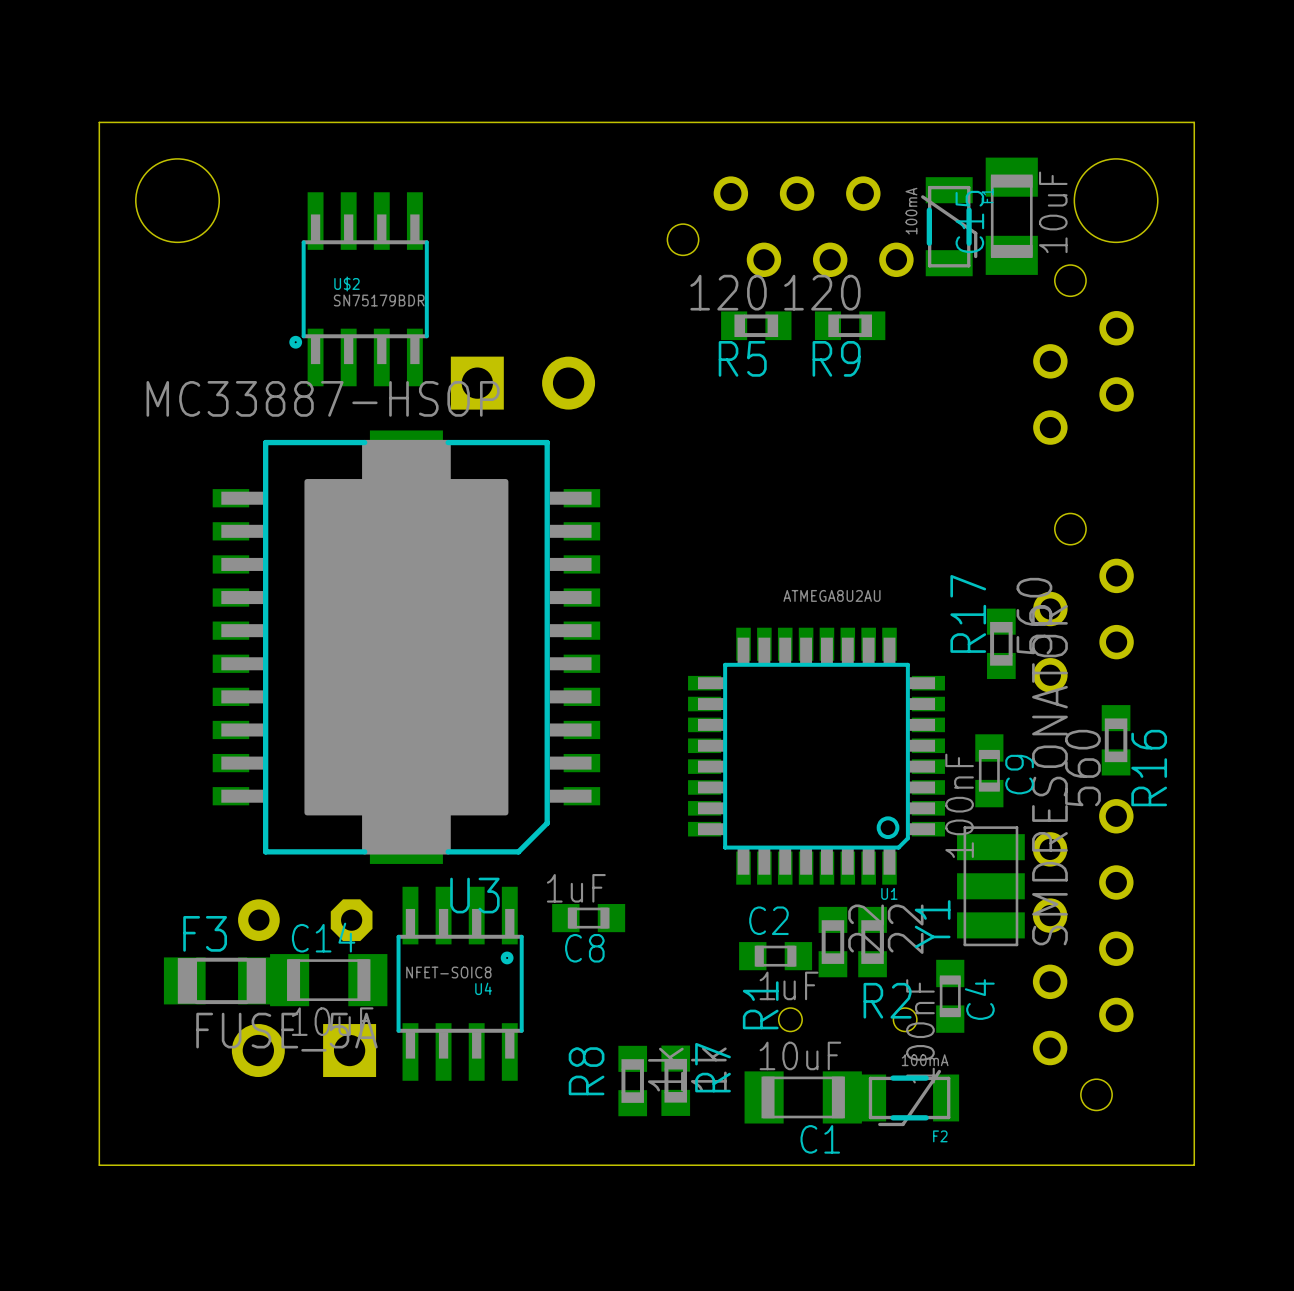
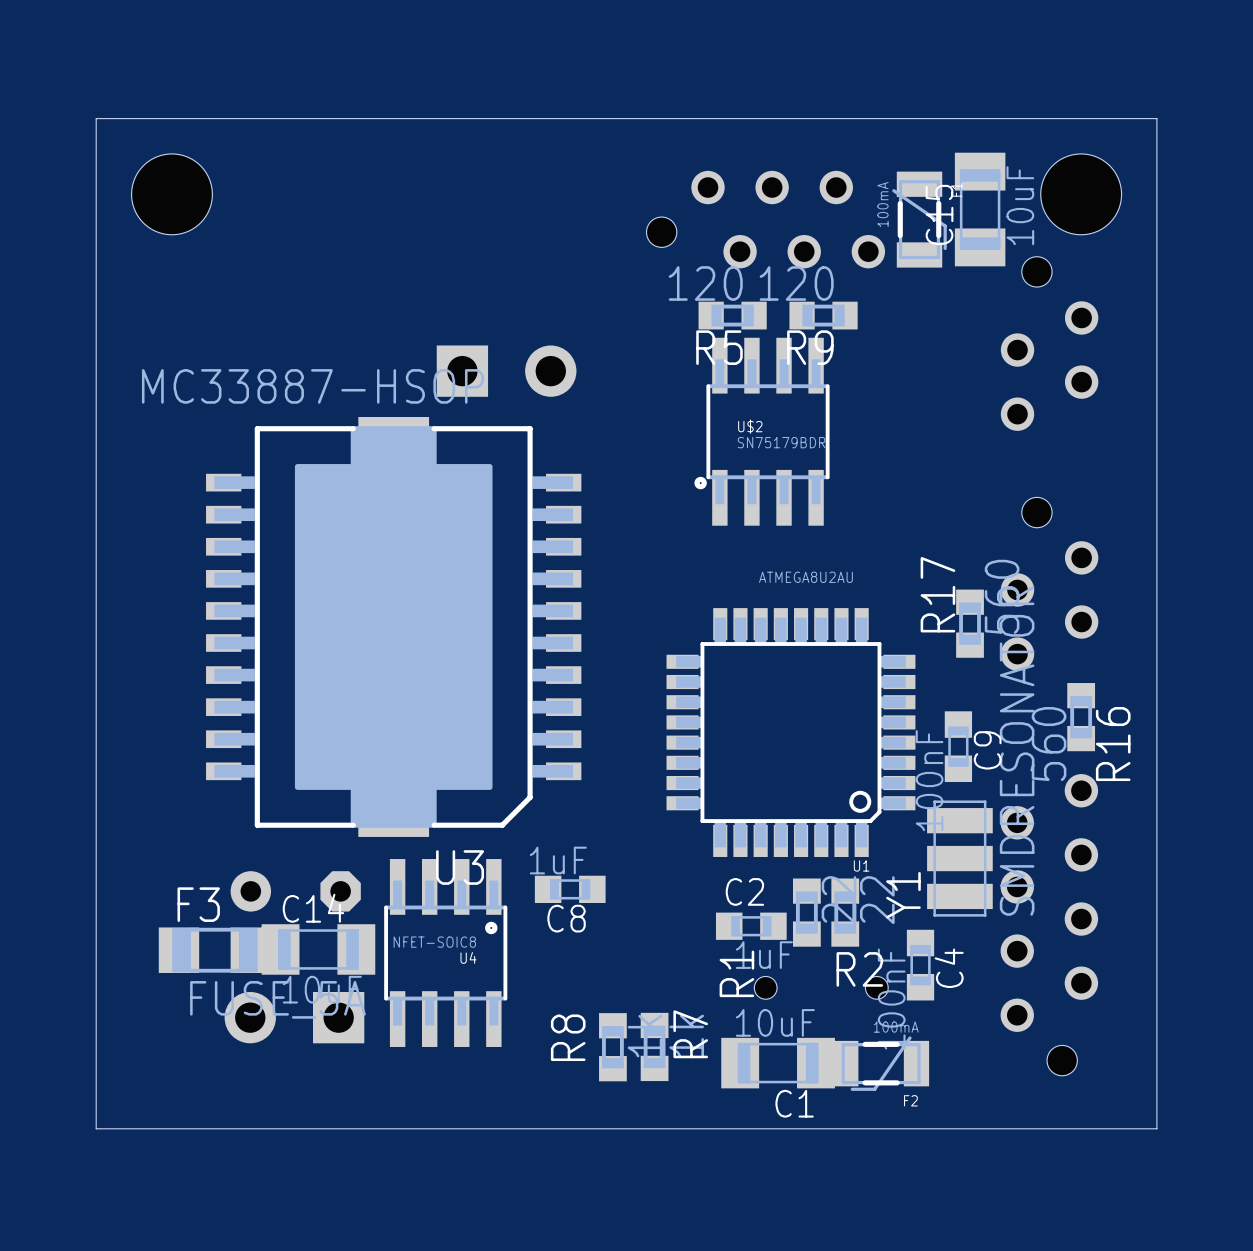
U$2 position: (359, 289) -> (762, 431)

